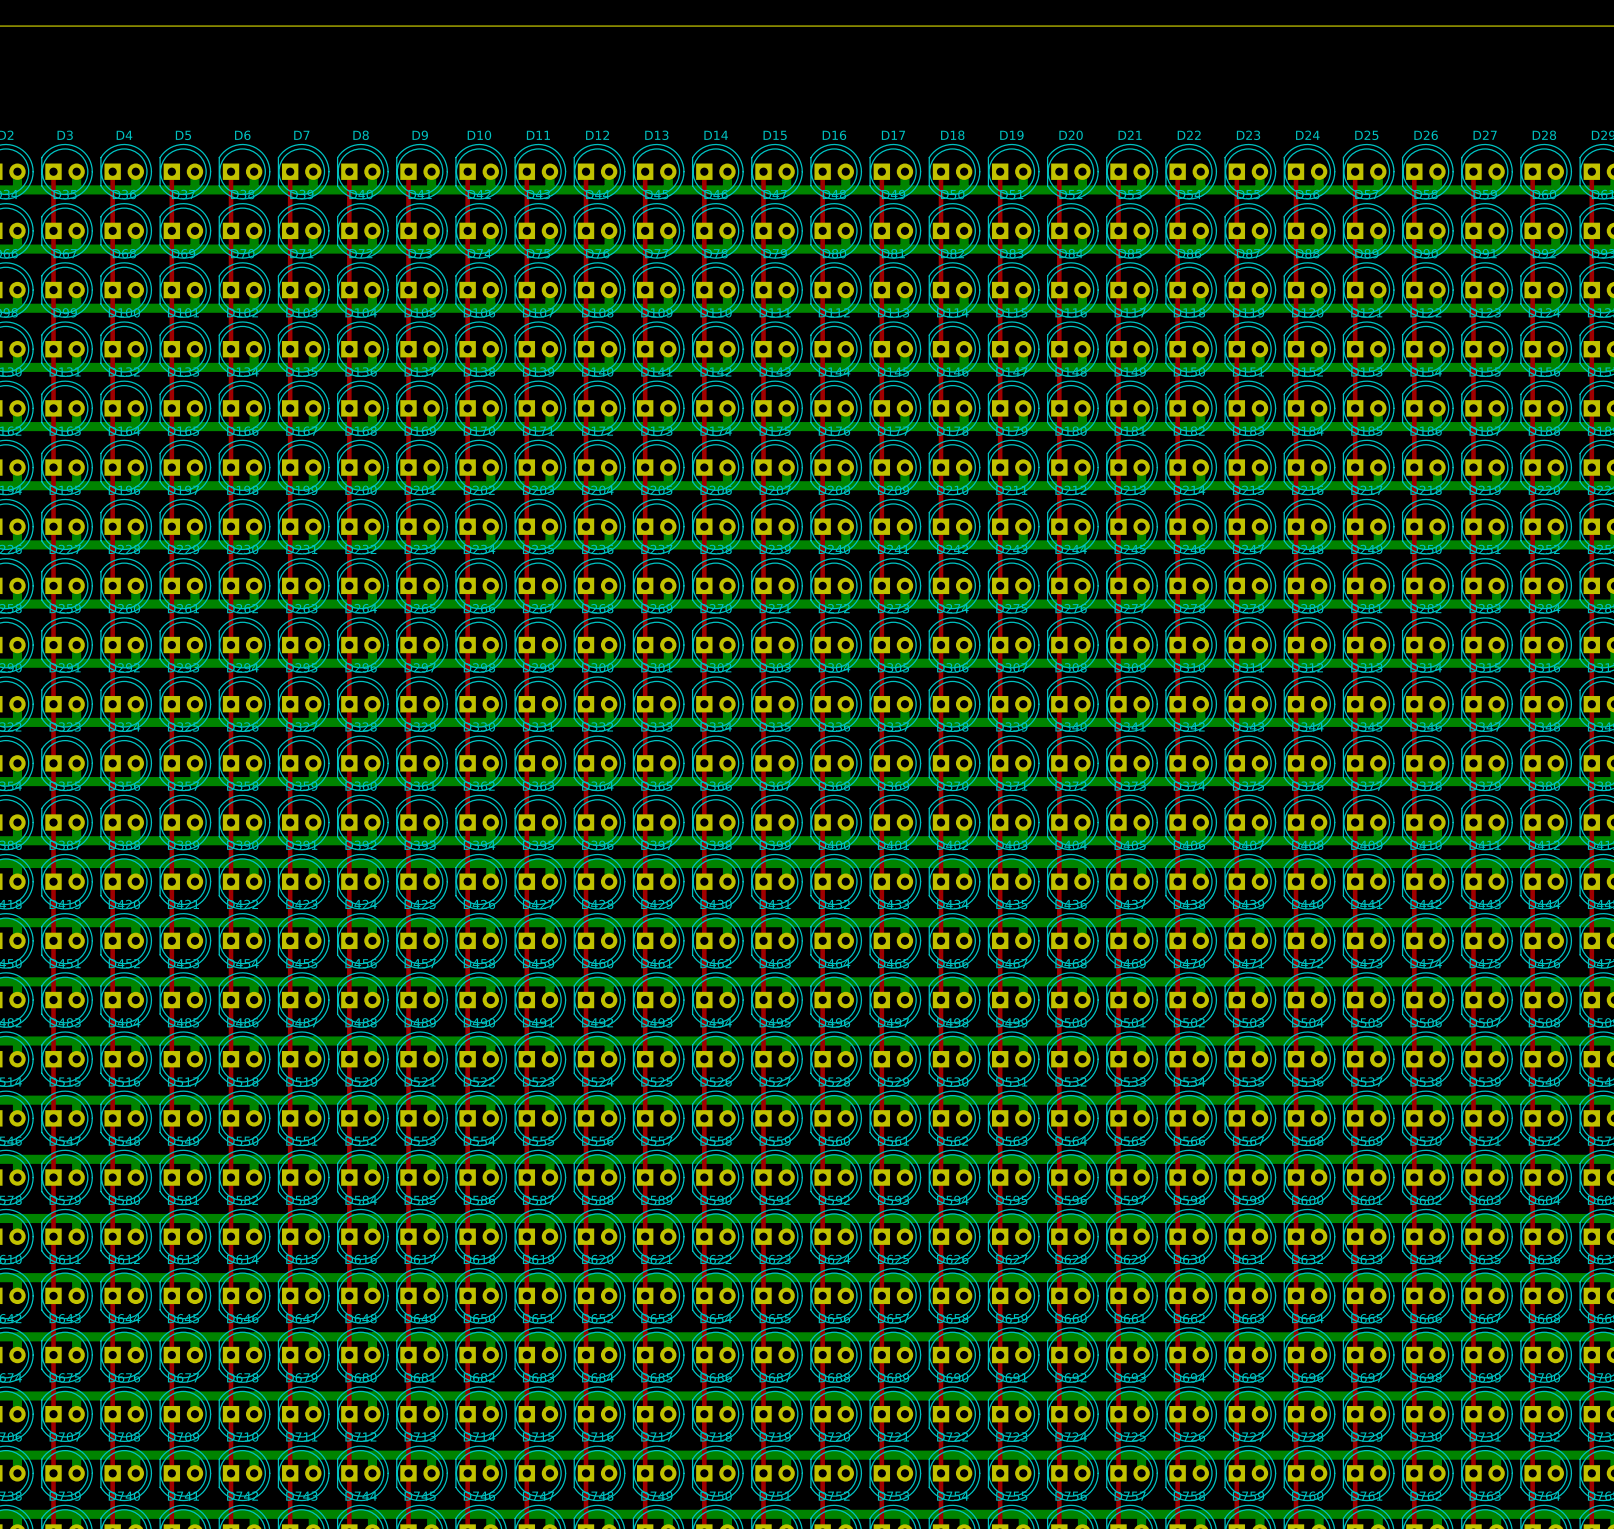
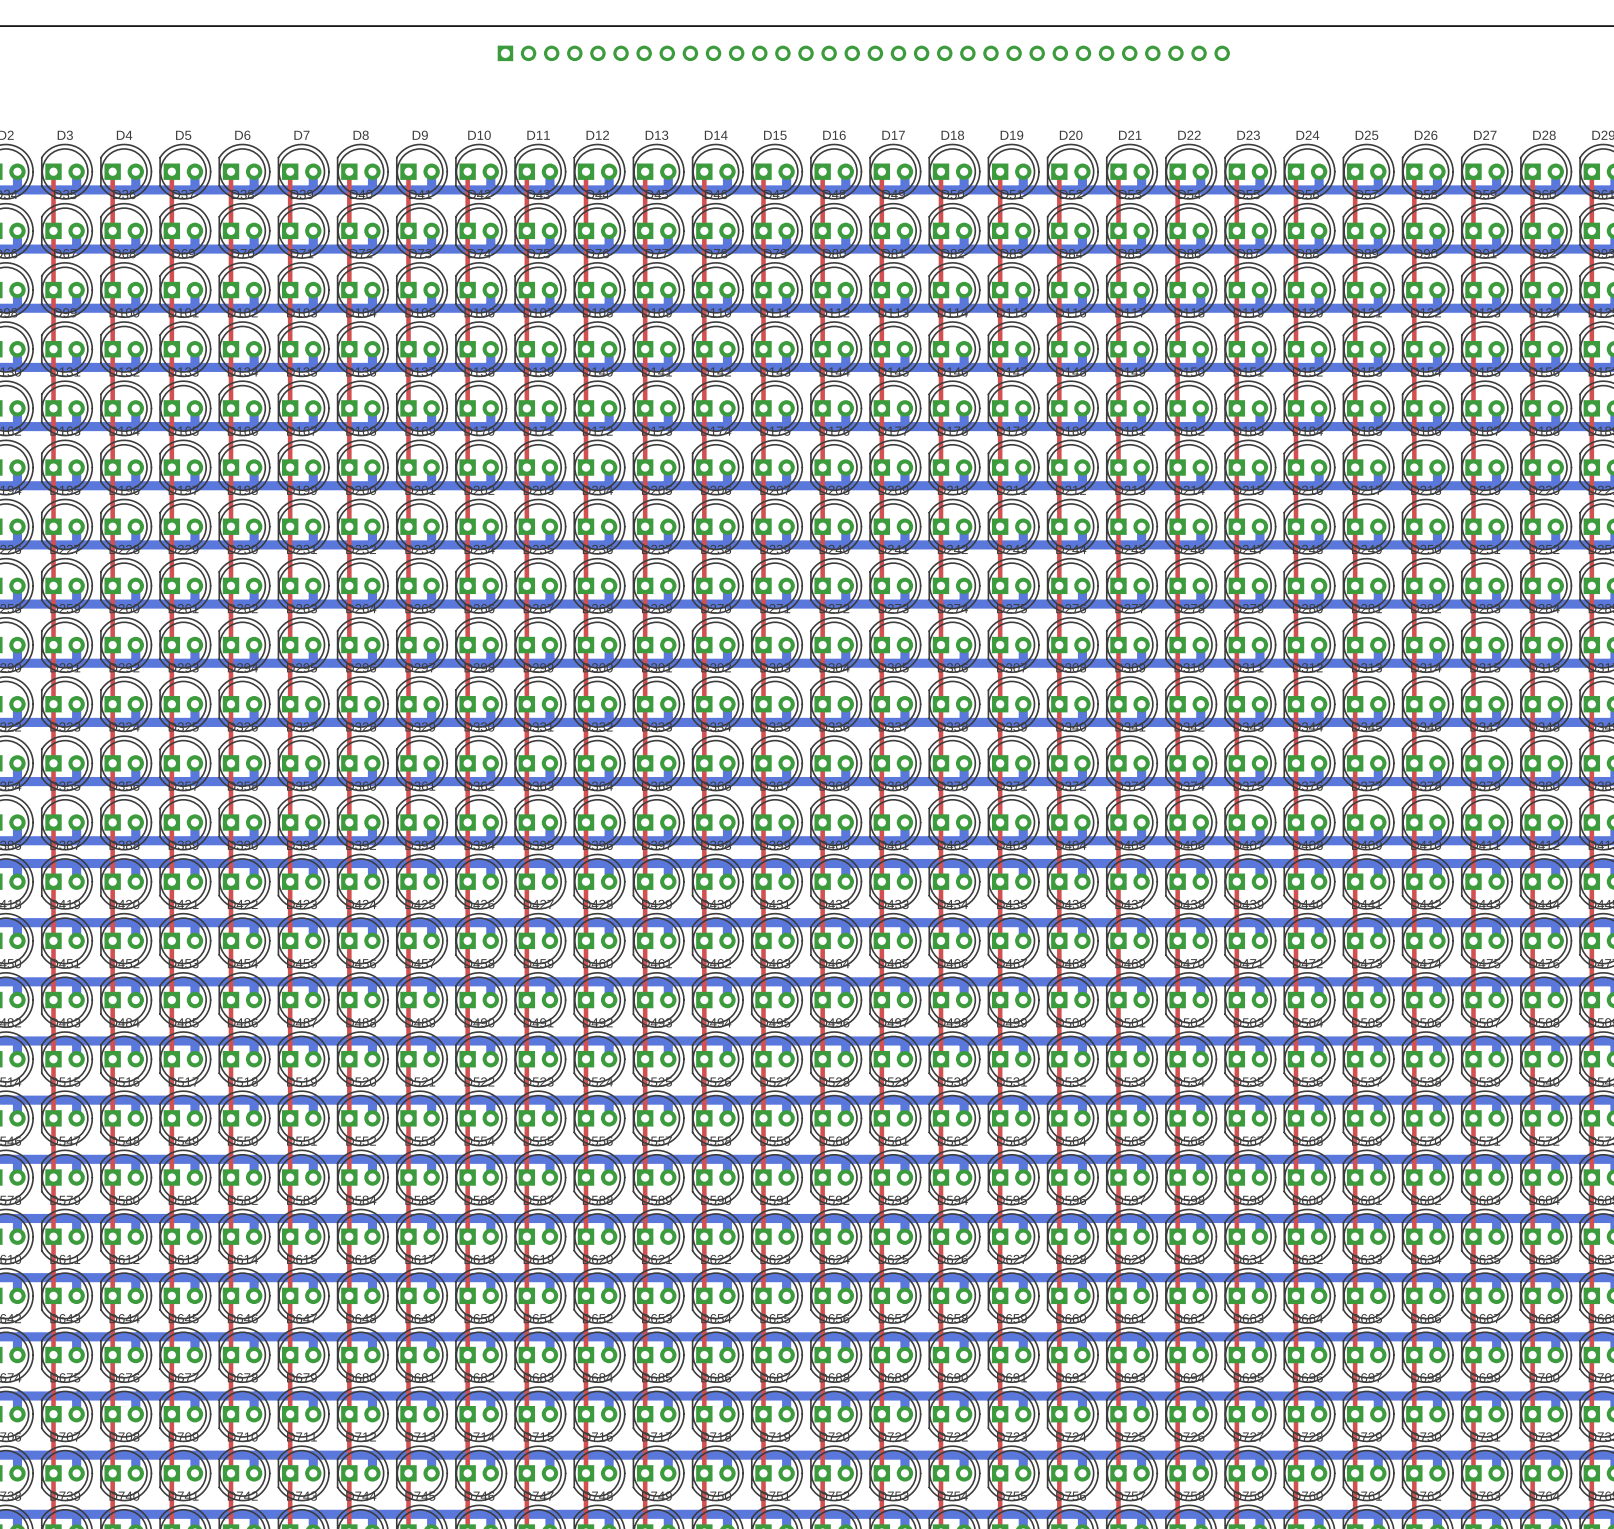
part: none -> (863, 53)

